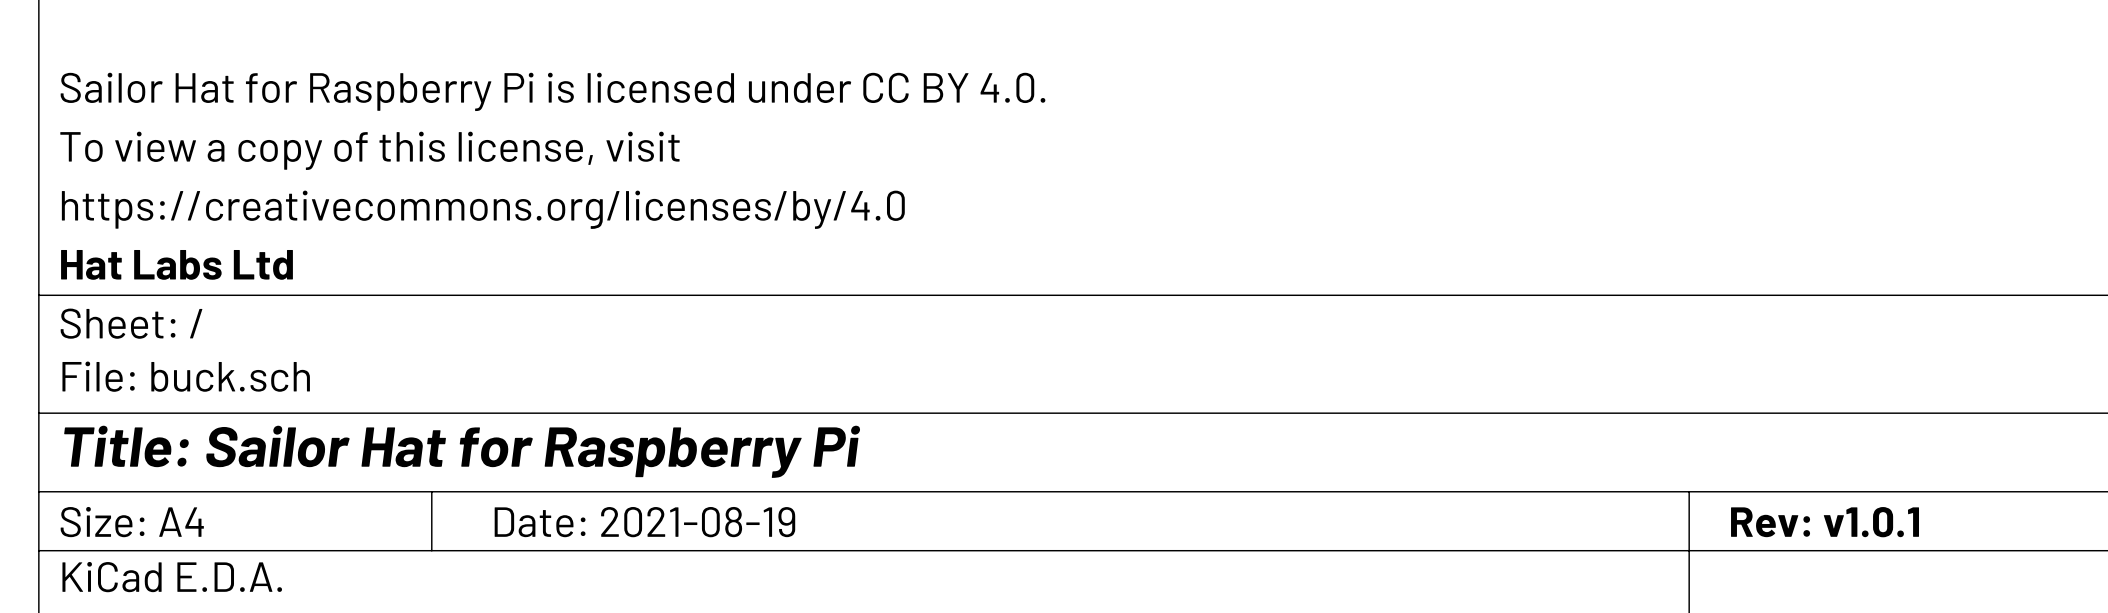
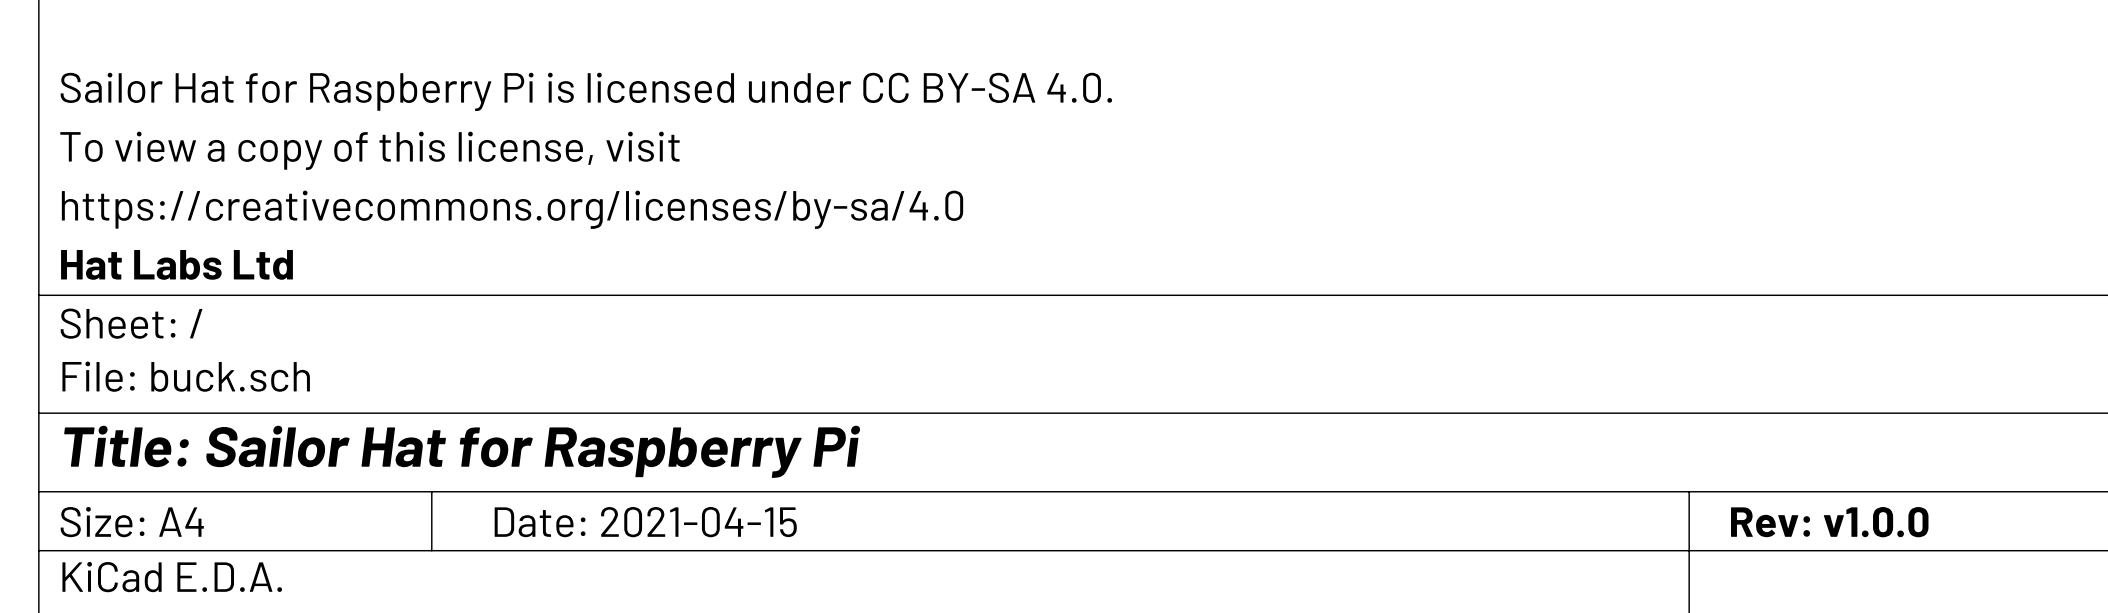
title block: Sailor Hat for Raspberry Pi is licensed under CC BY 4.0. (553, 91) -> Sailor Hat for Raspberry Pi is licensed under CC BY-SA 4.0. (586, 91)
title block: https://creativecommons.org/licenses/by/4.0 (483, 209) -> https://creativecommons.org/licenses/by-sa/4.0 (512, 209)
title block: Date: 2021-08-19 (644, 522) -> Date: 2021-04-15 (645, 522)
title block: Rev: v1.0.1 (1825, 522) -> Rev: v1.0.0 (1829, 522)

